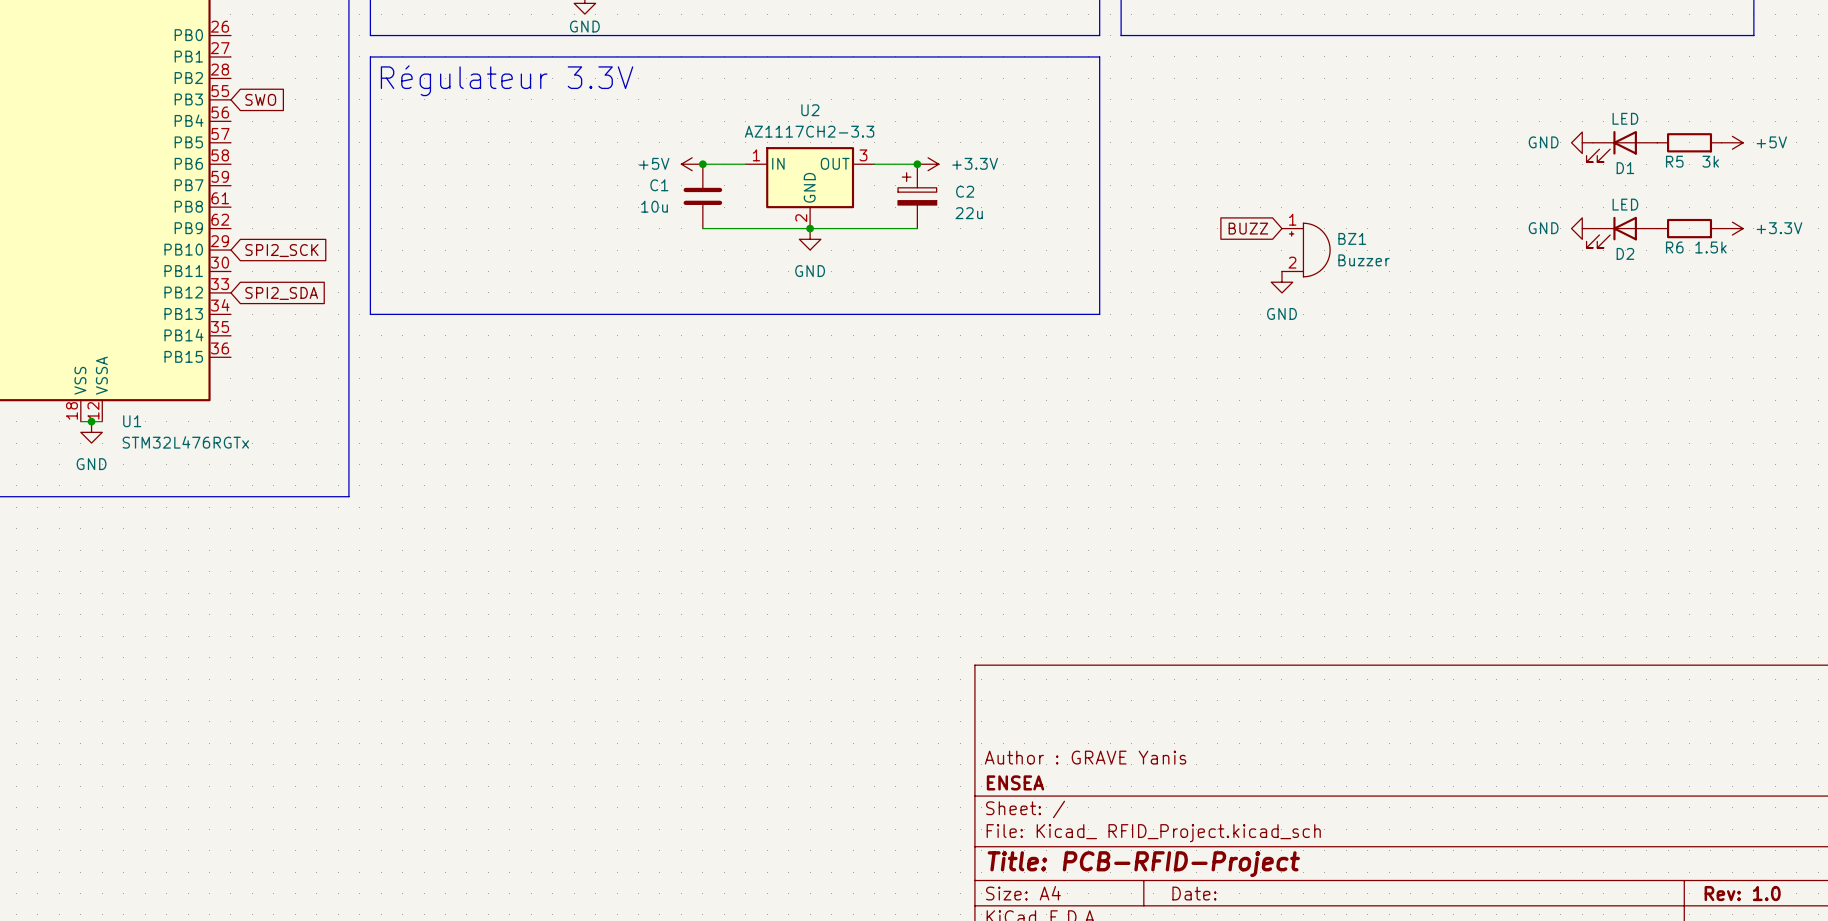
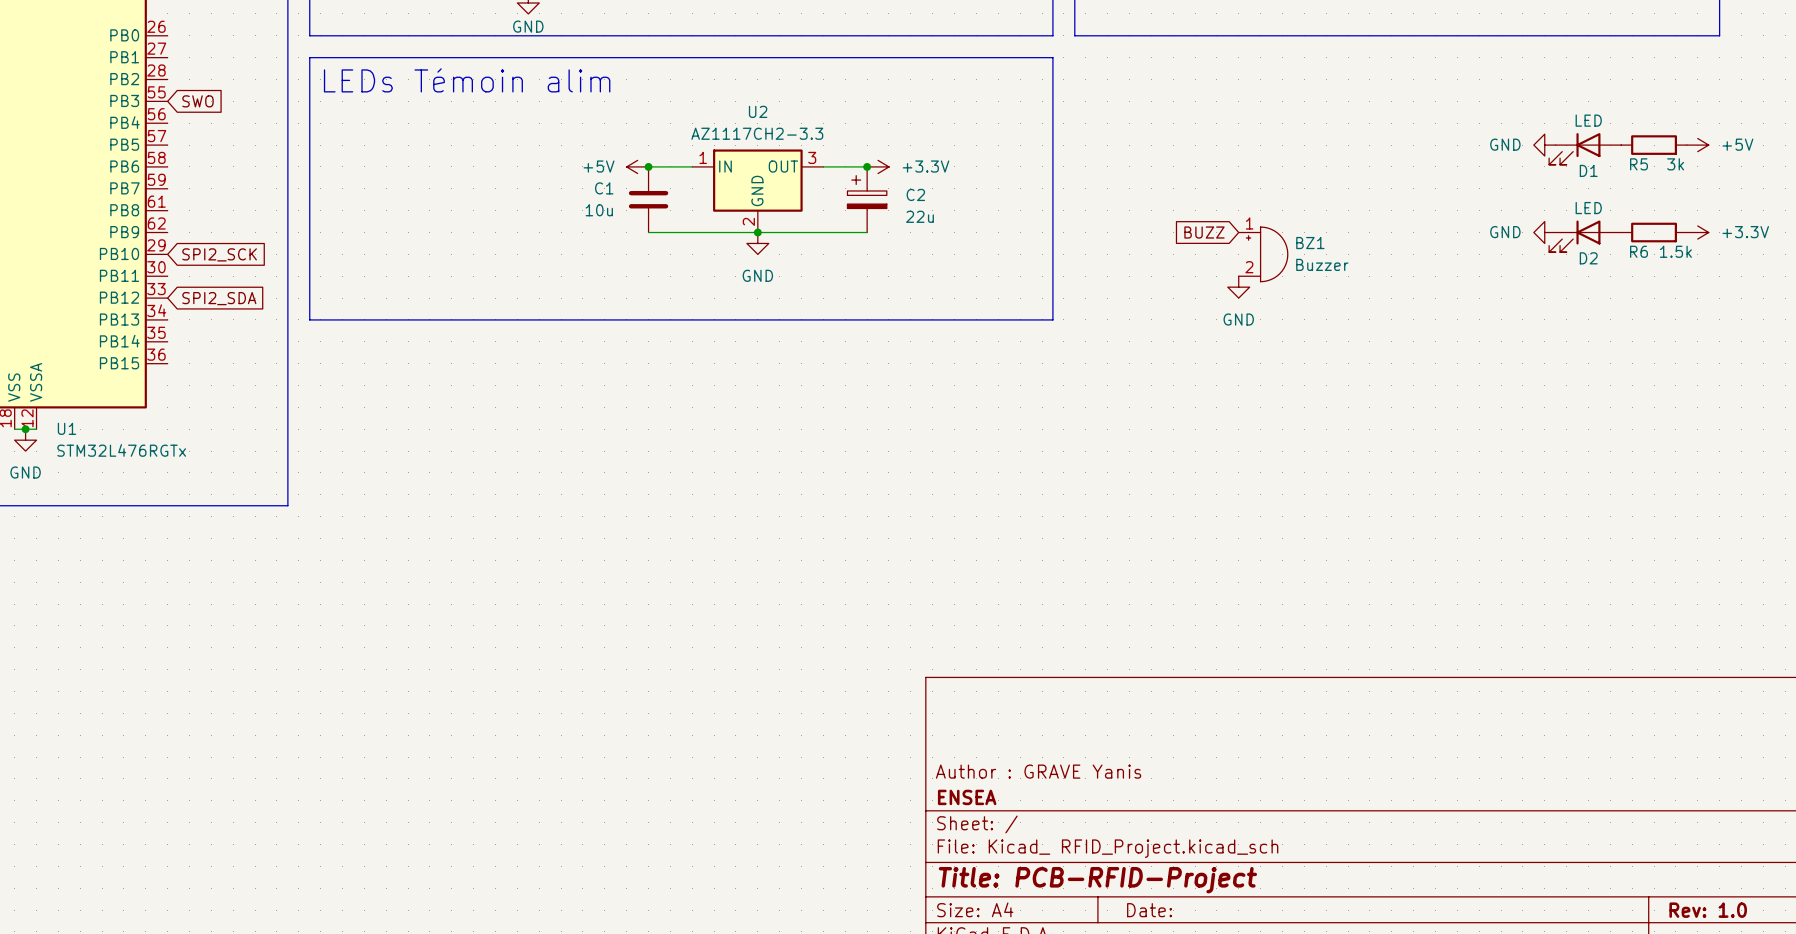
text: none -> LEDs Témoin alim (467, 80)
text: Régulateur 3.3V (507, 80) -> none

